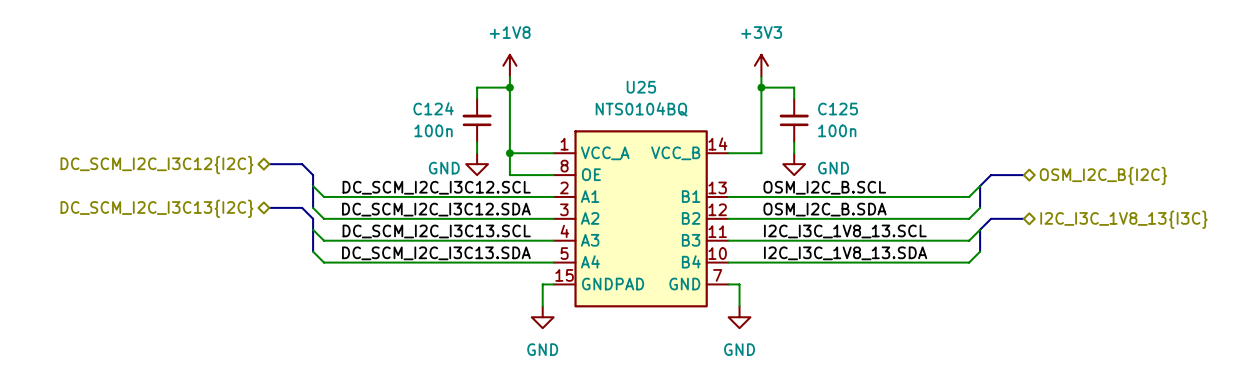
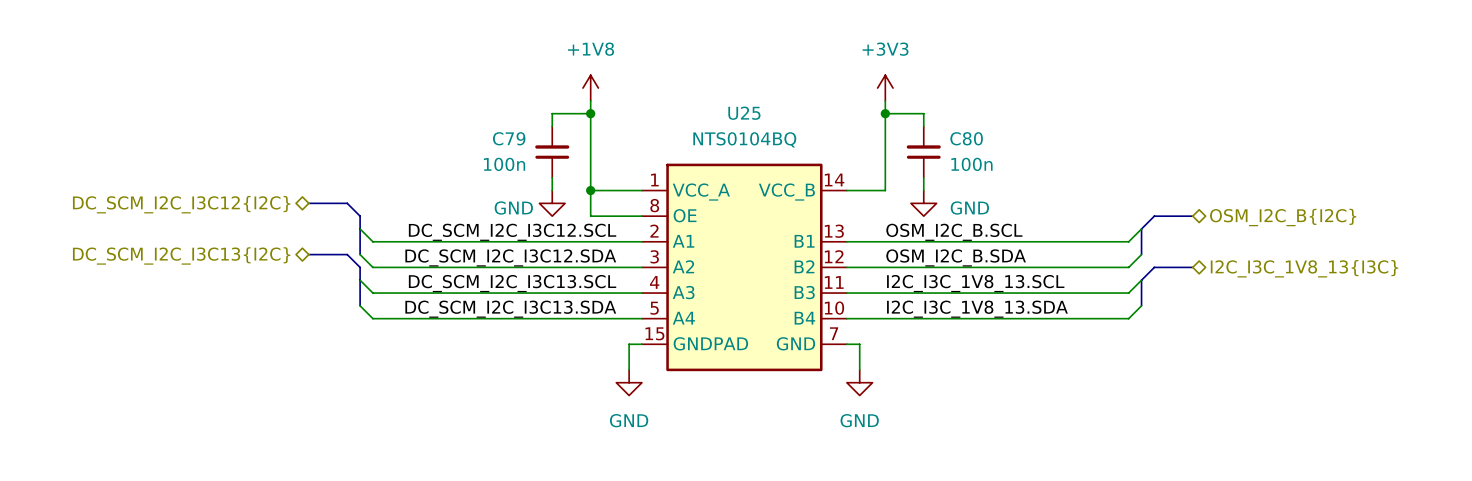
C124 name: C124 (433, 108) -> C79 (509, 138)
C125 name: C125 (838, 109) -> C80 (966, 138)

